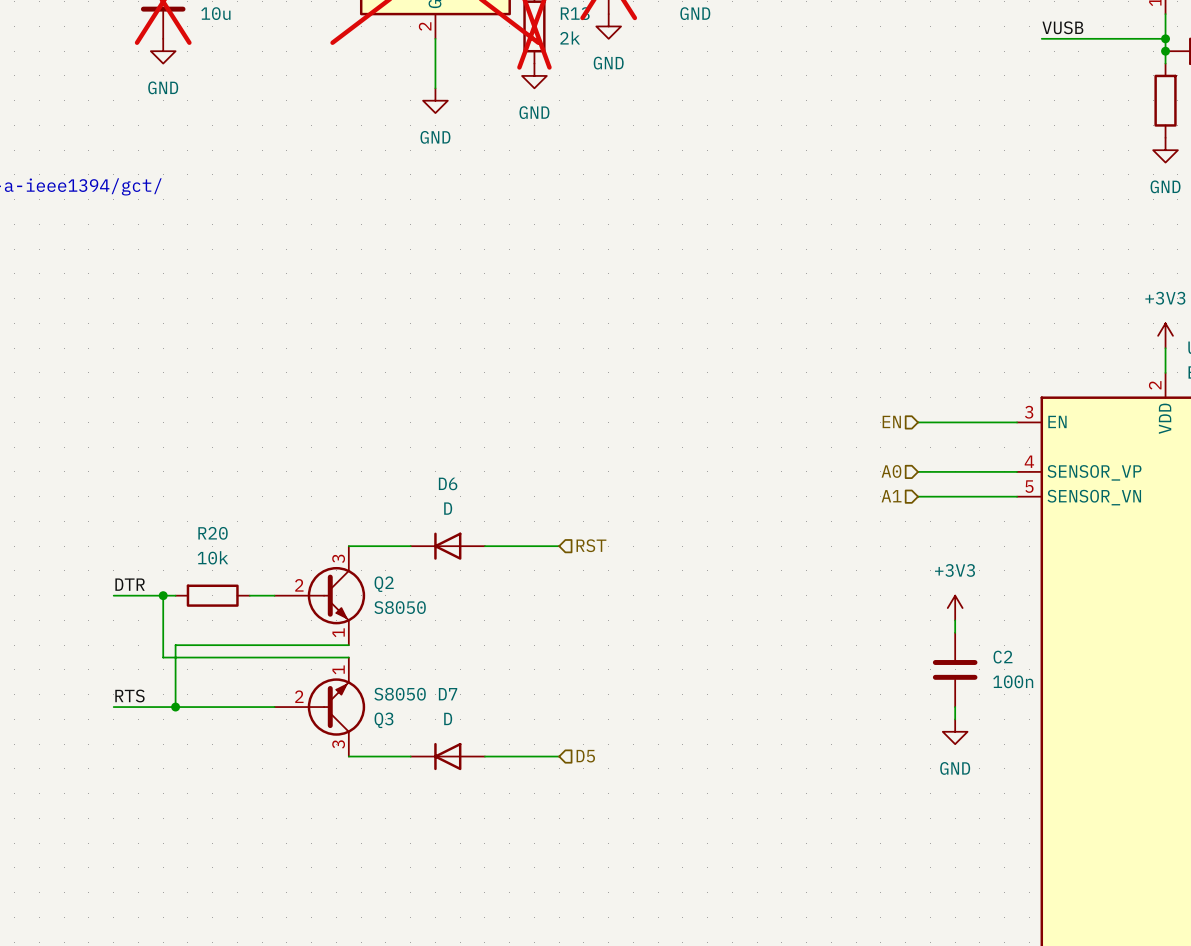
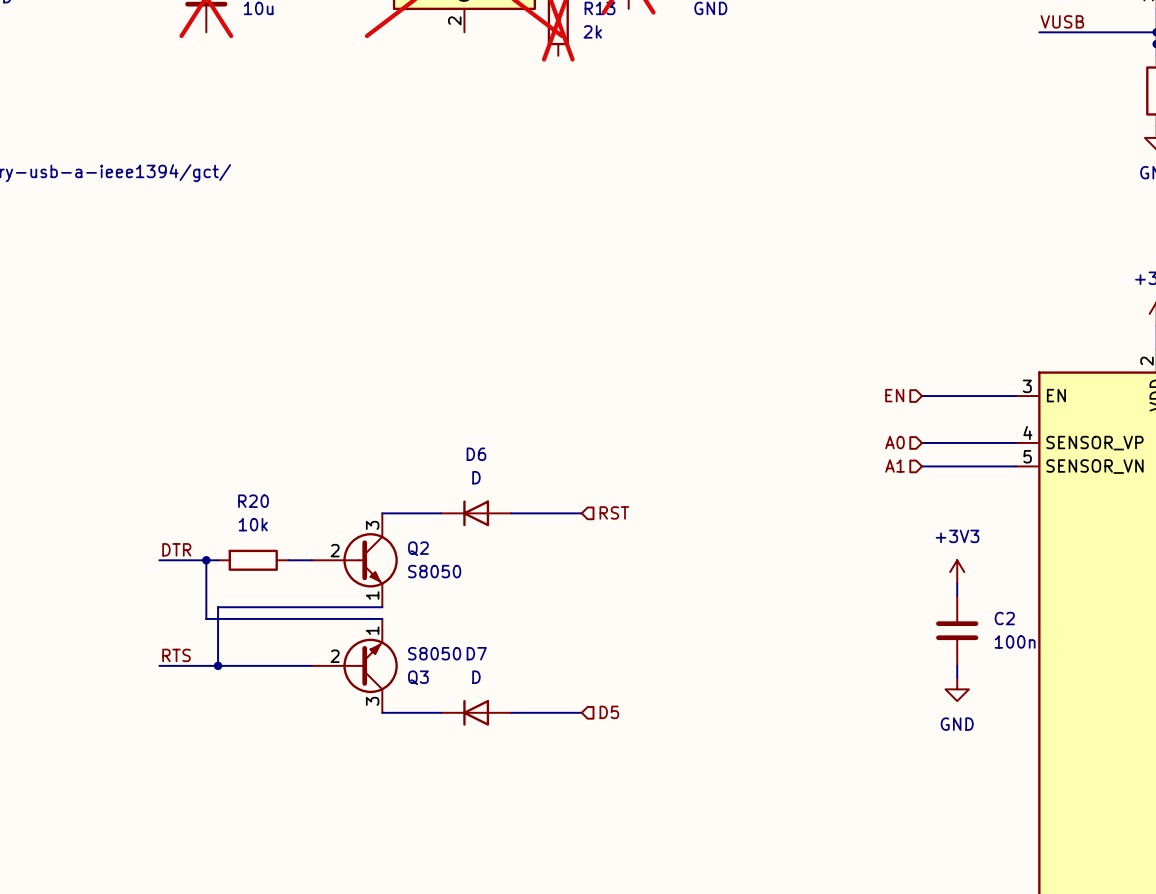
power symbol: GND (608, 26) -> none
wire: (435, 38) (435, 88) -> none
power symbol: GND (163, 51) -> none
power symbol: GND (534, 75) -> none
power symbol: GND (435, 100) -> none

